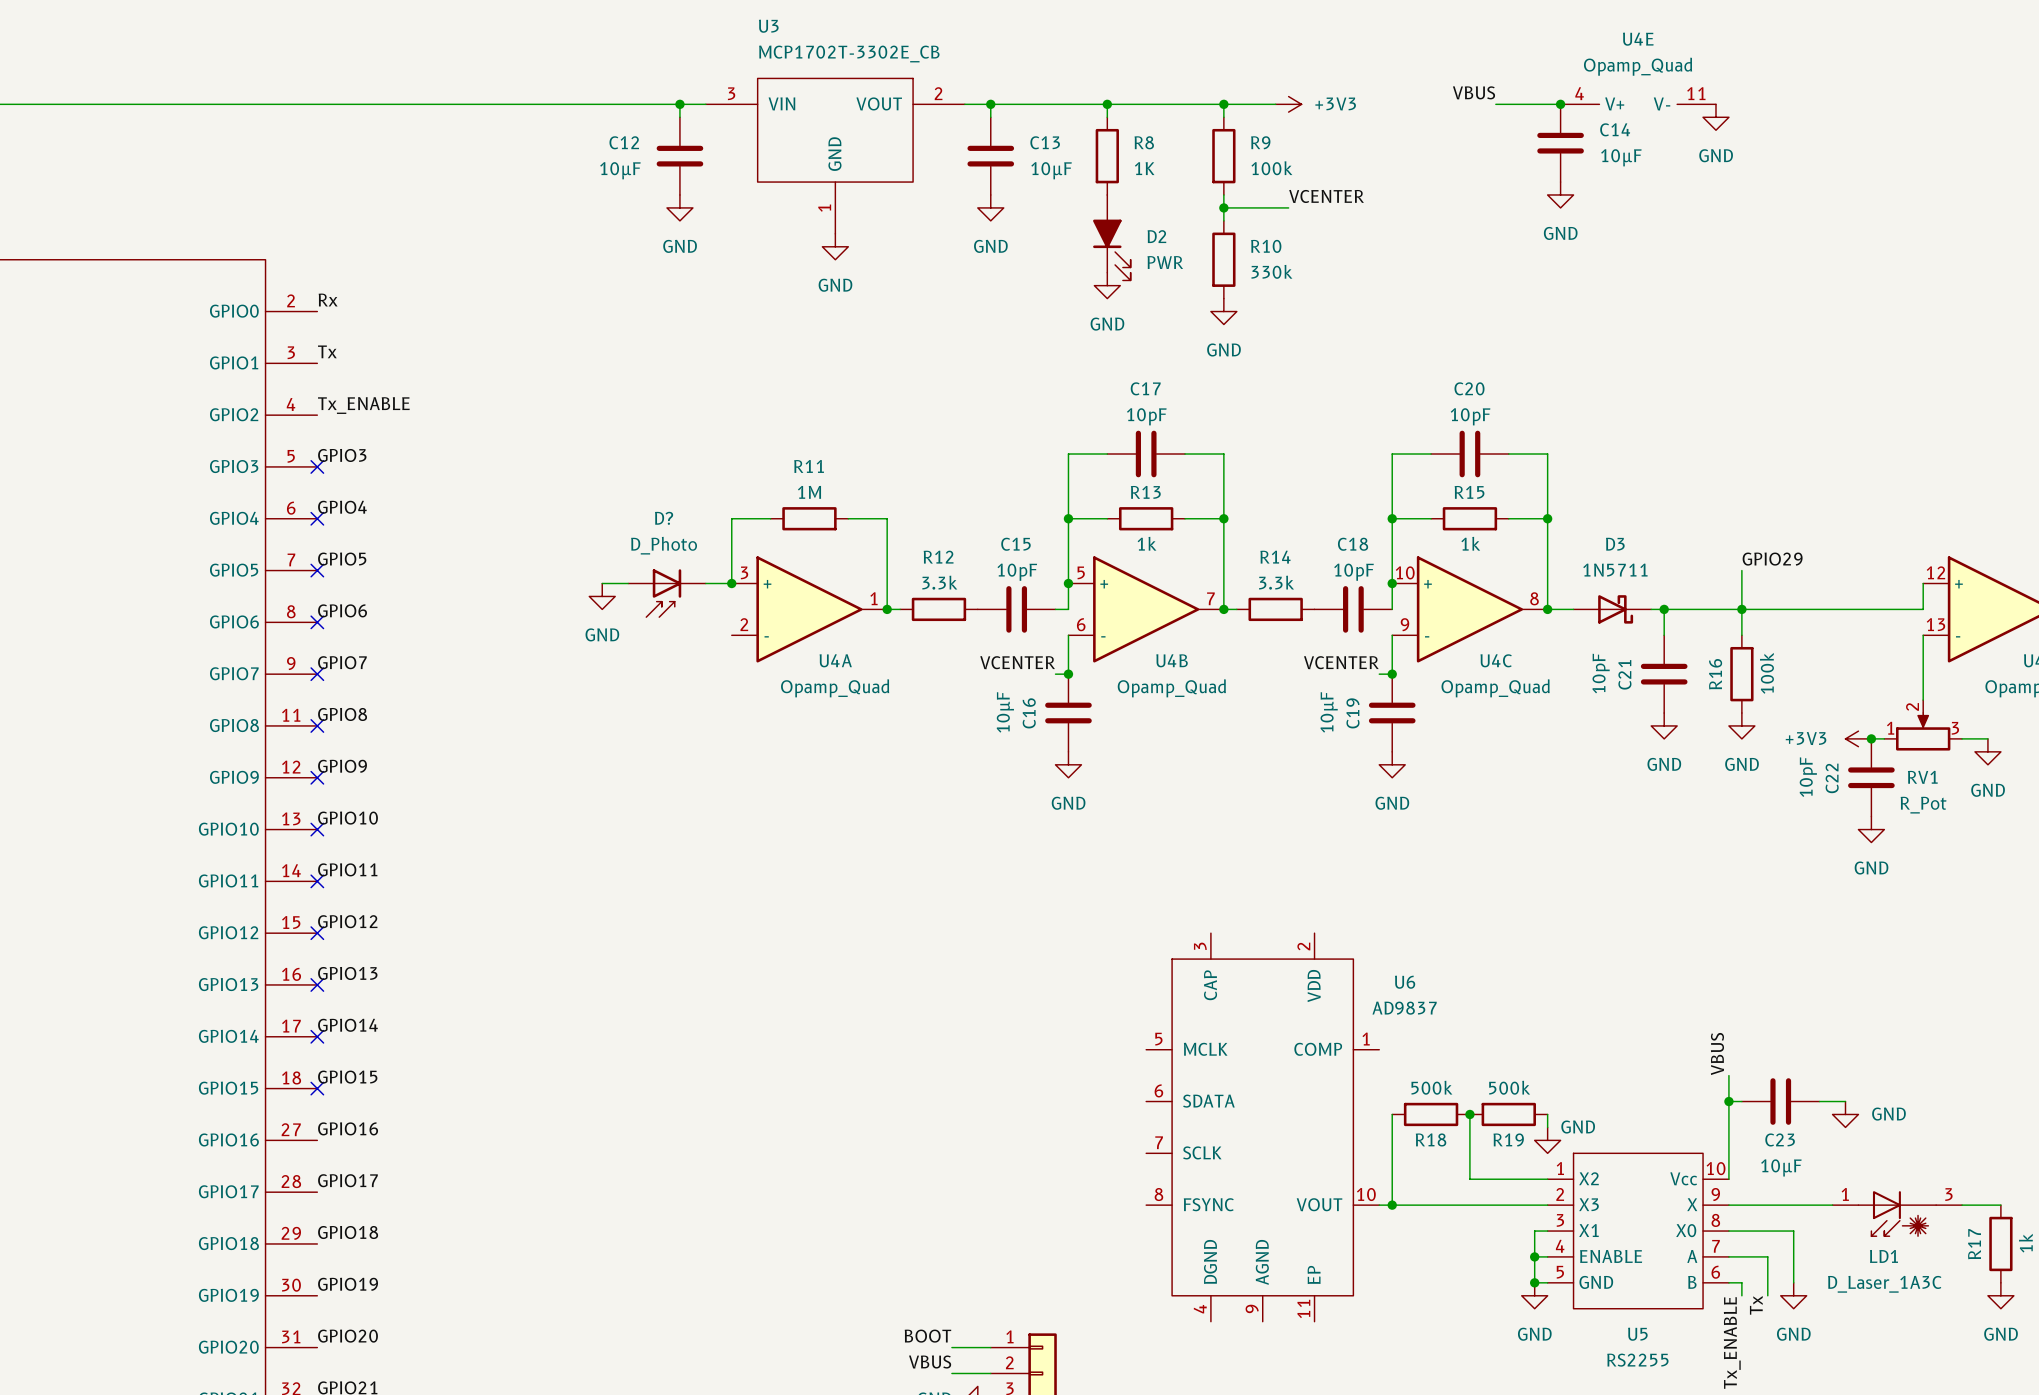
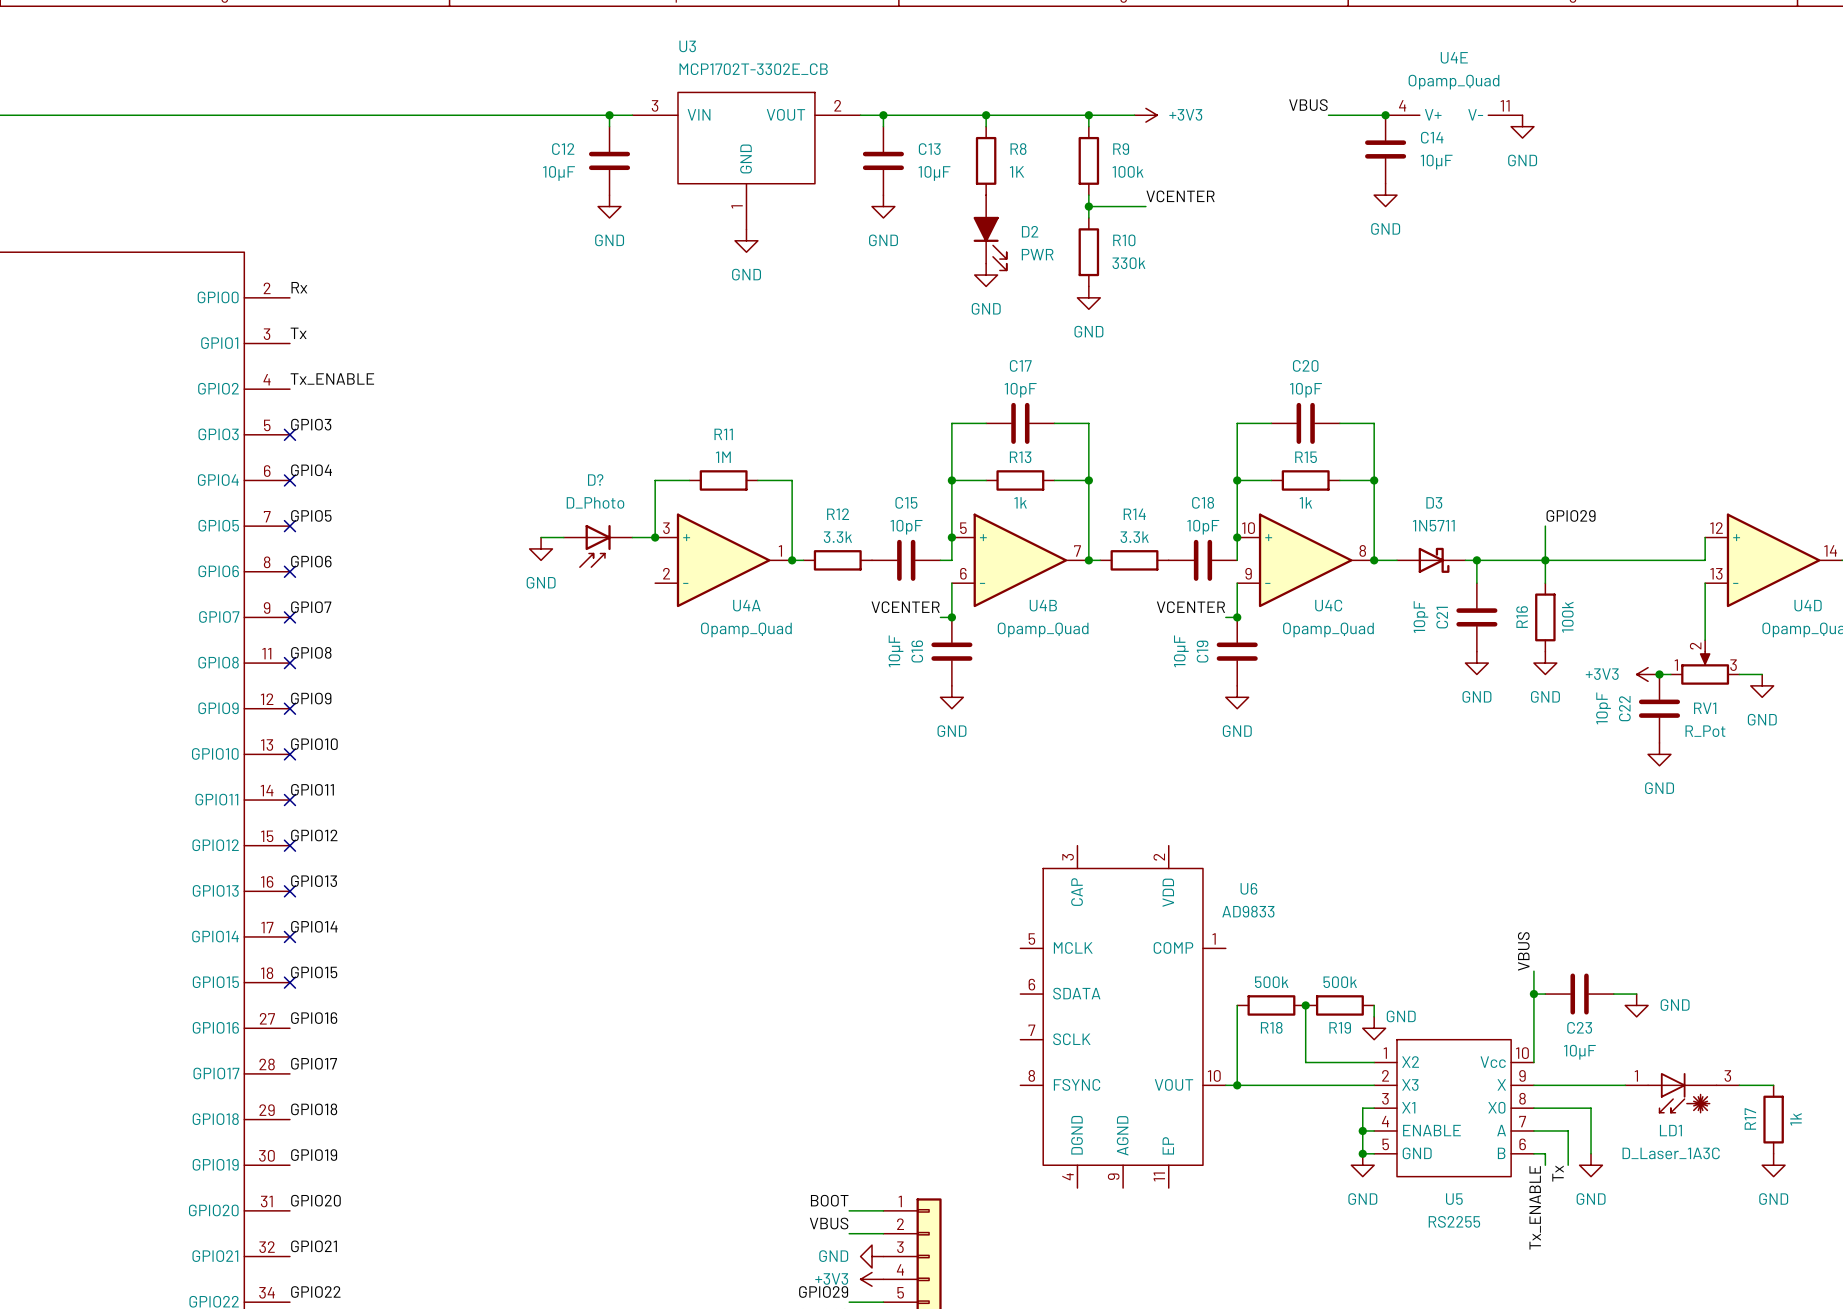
U6 value: AD9837 (1404, 1008) -> AD9833 (1248, 911)

